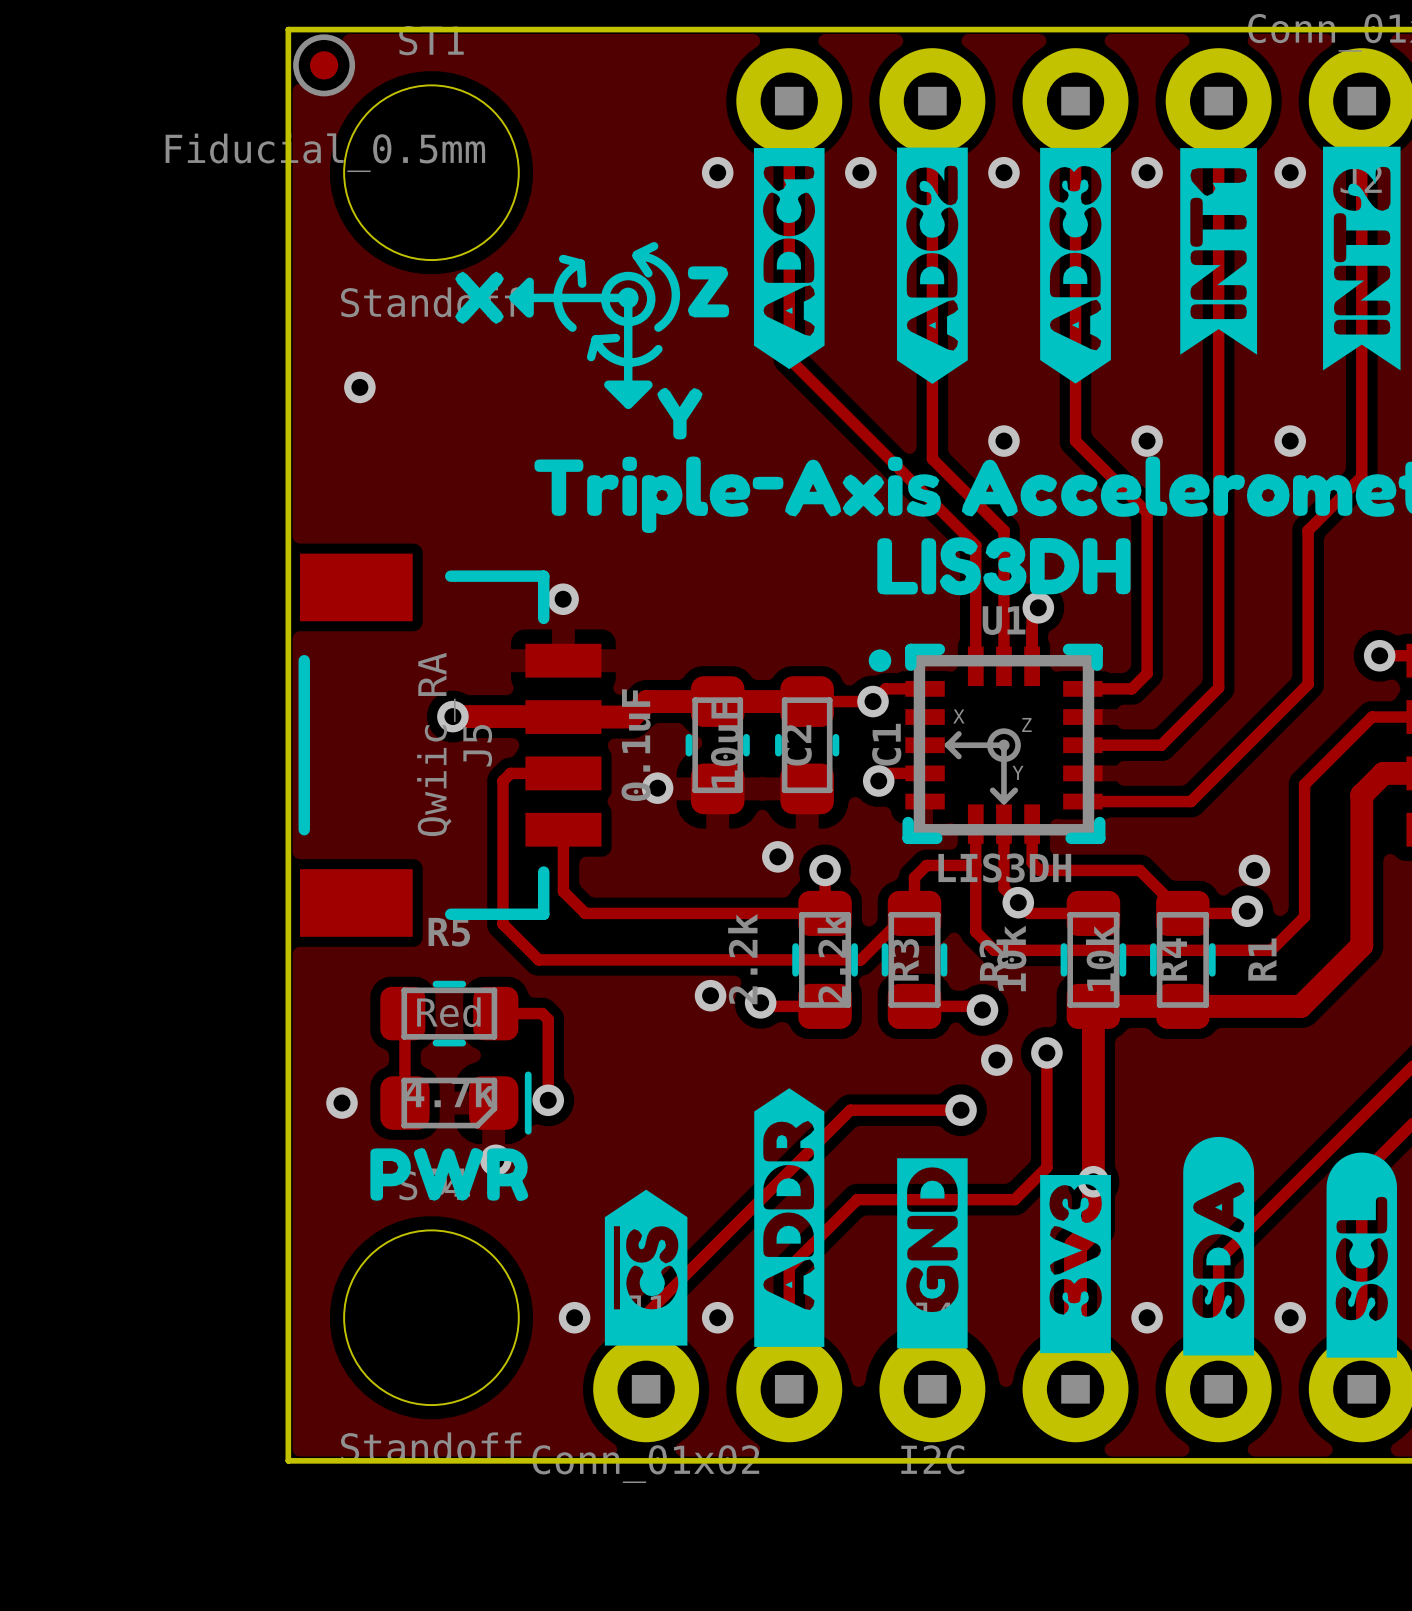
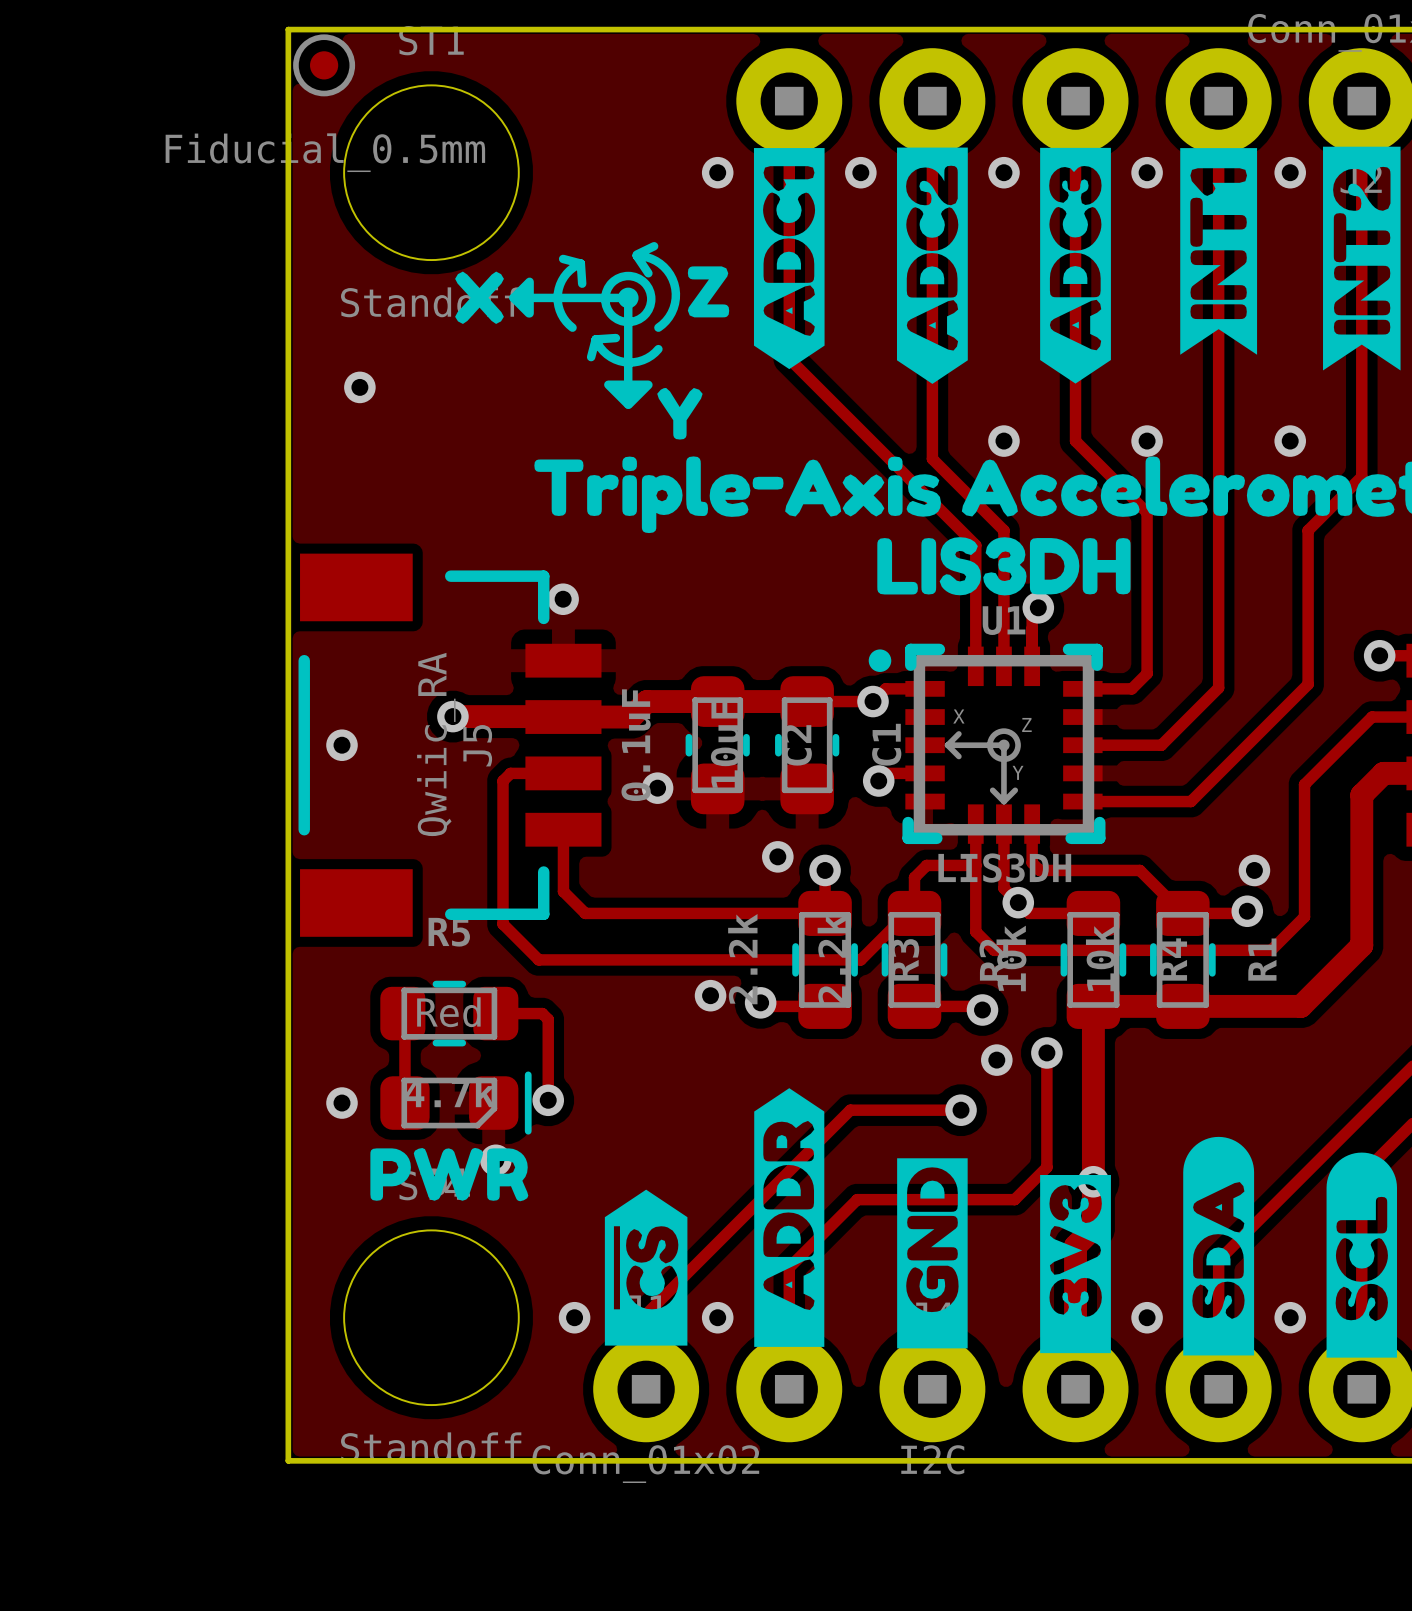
via: none -> (341, 745)

